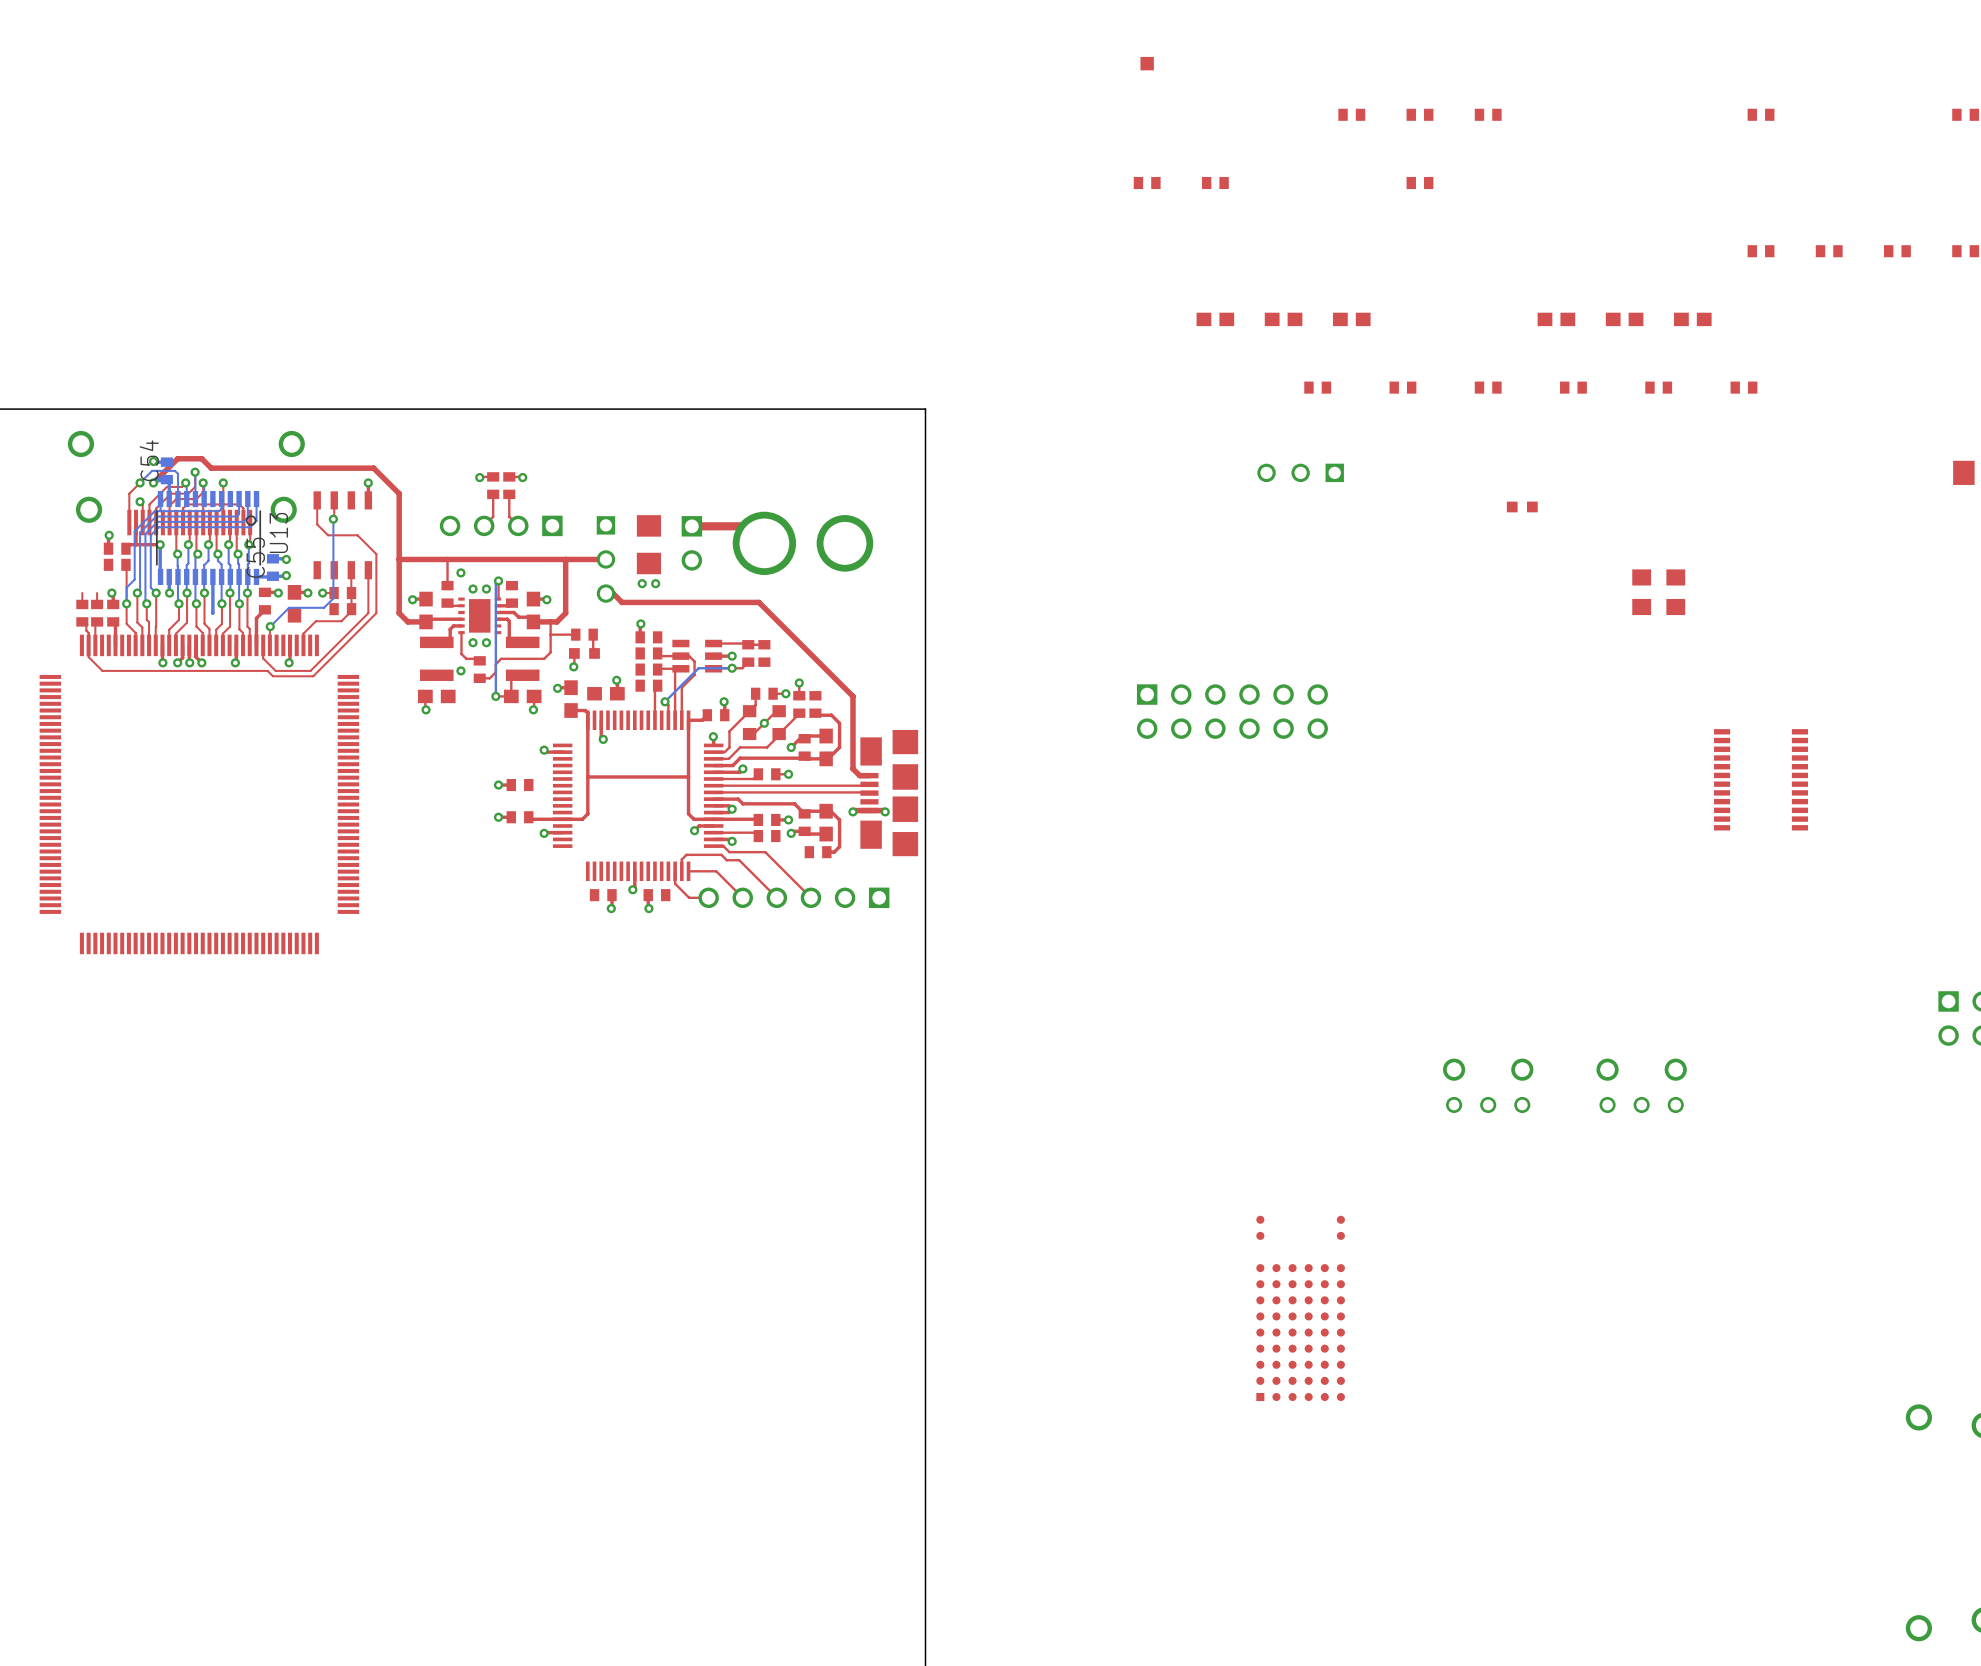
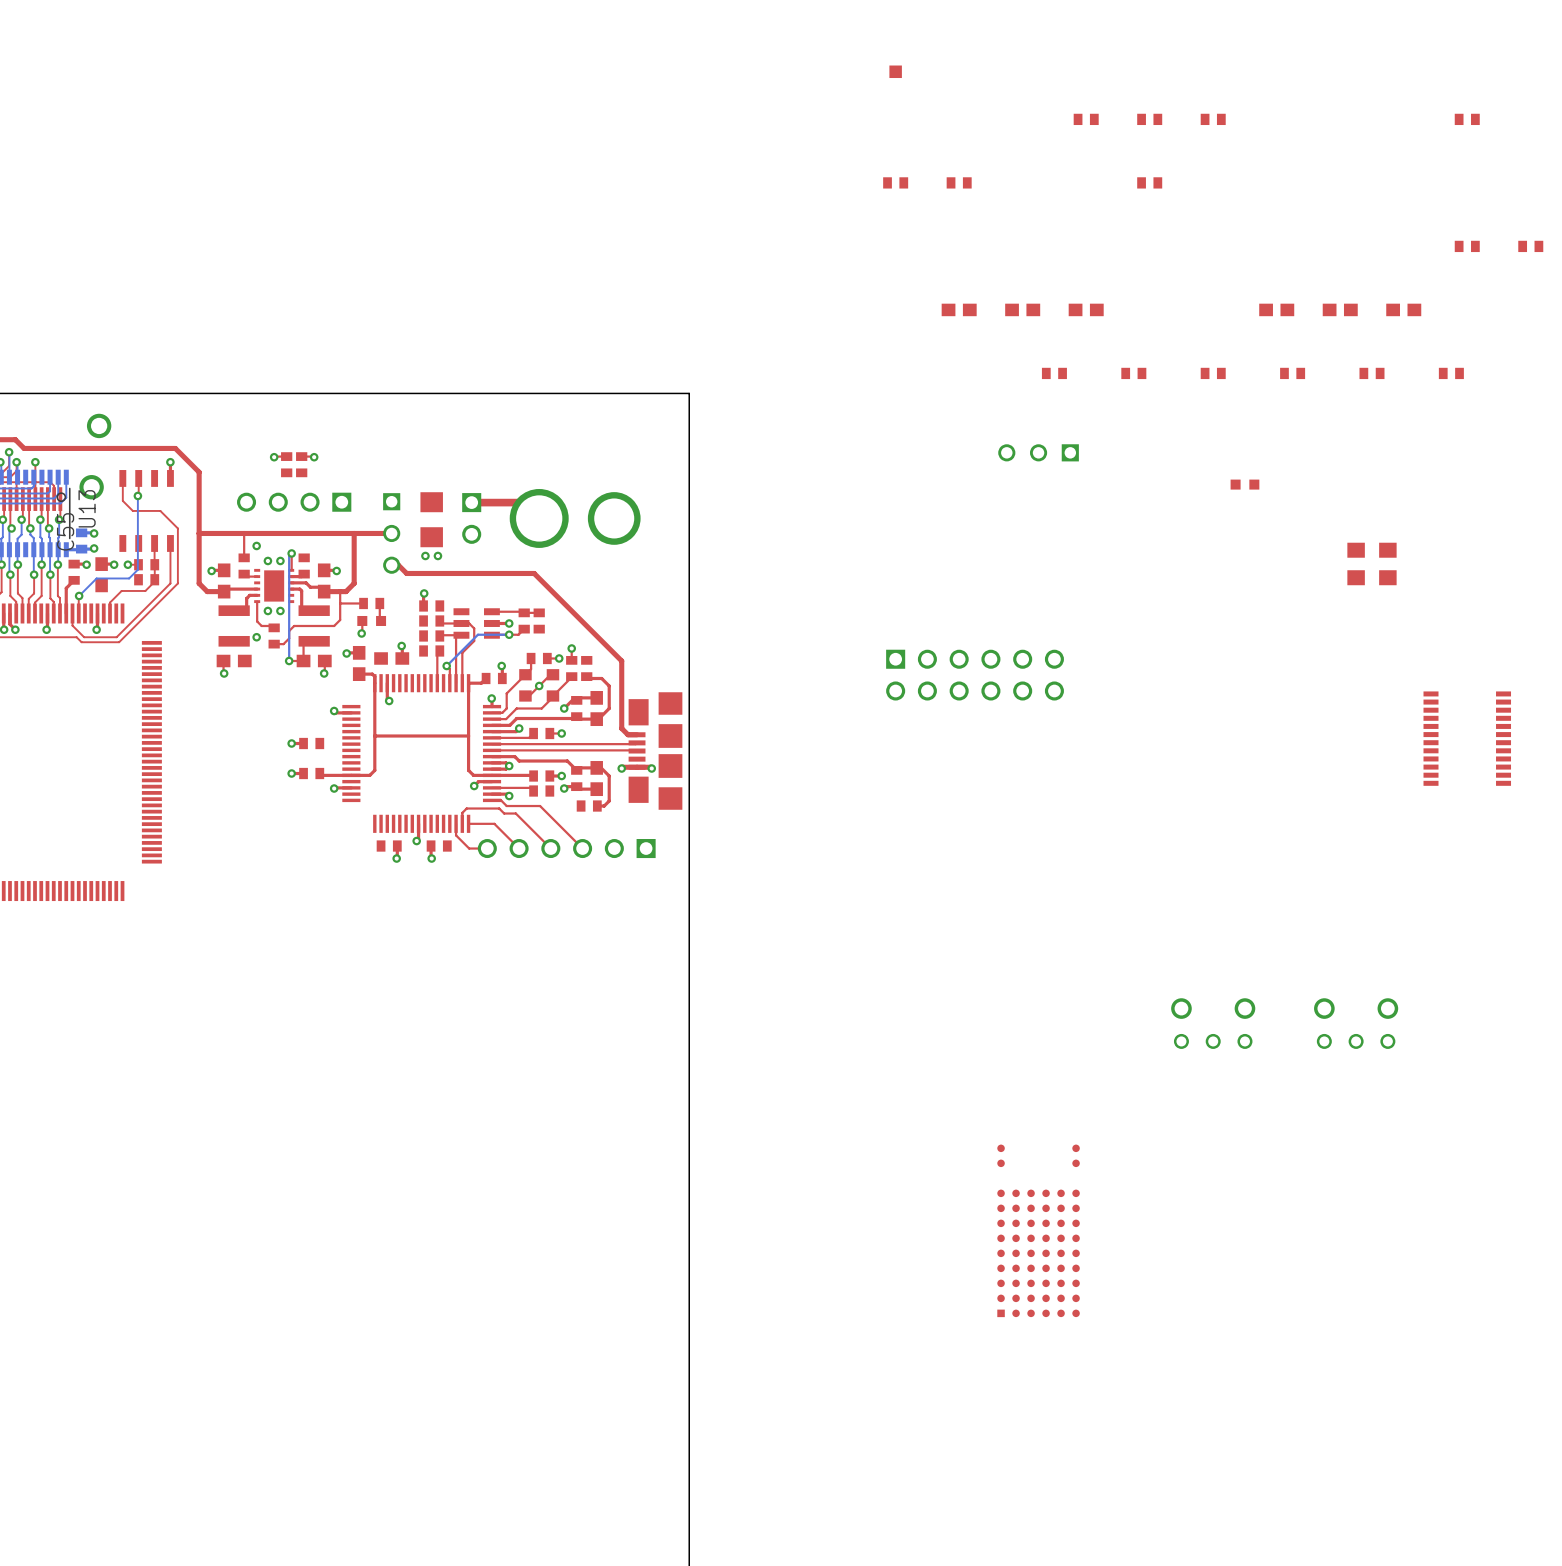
top track: (493, 494) (493, 516) (484, 525) -> none
top track: (509, 494) (509, 516) (518, 525) -> none
bottom track: (212, 576) (212, 613) -> none

